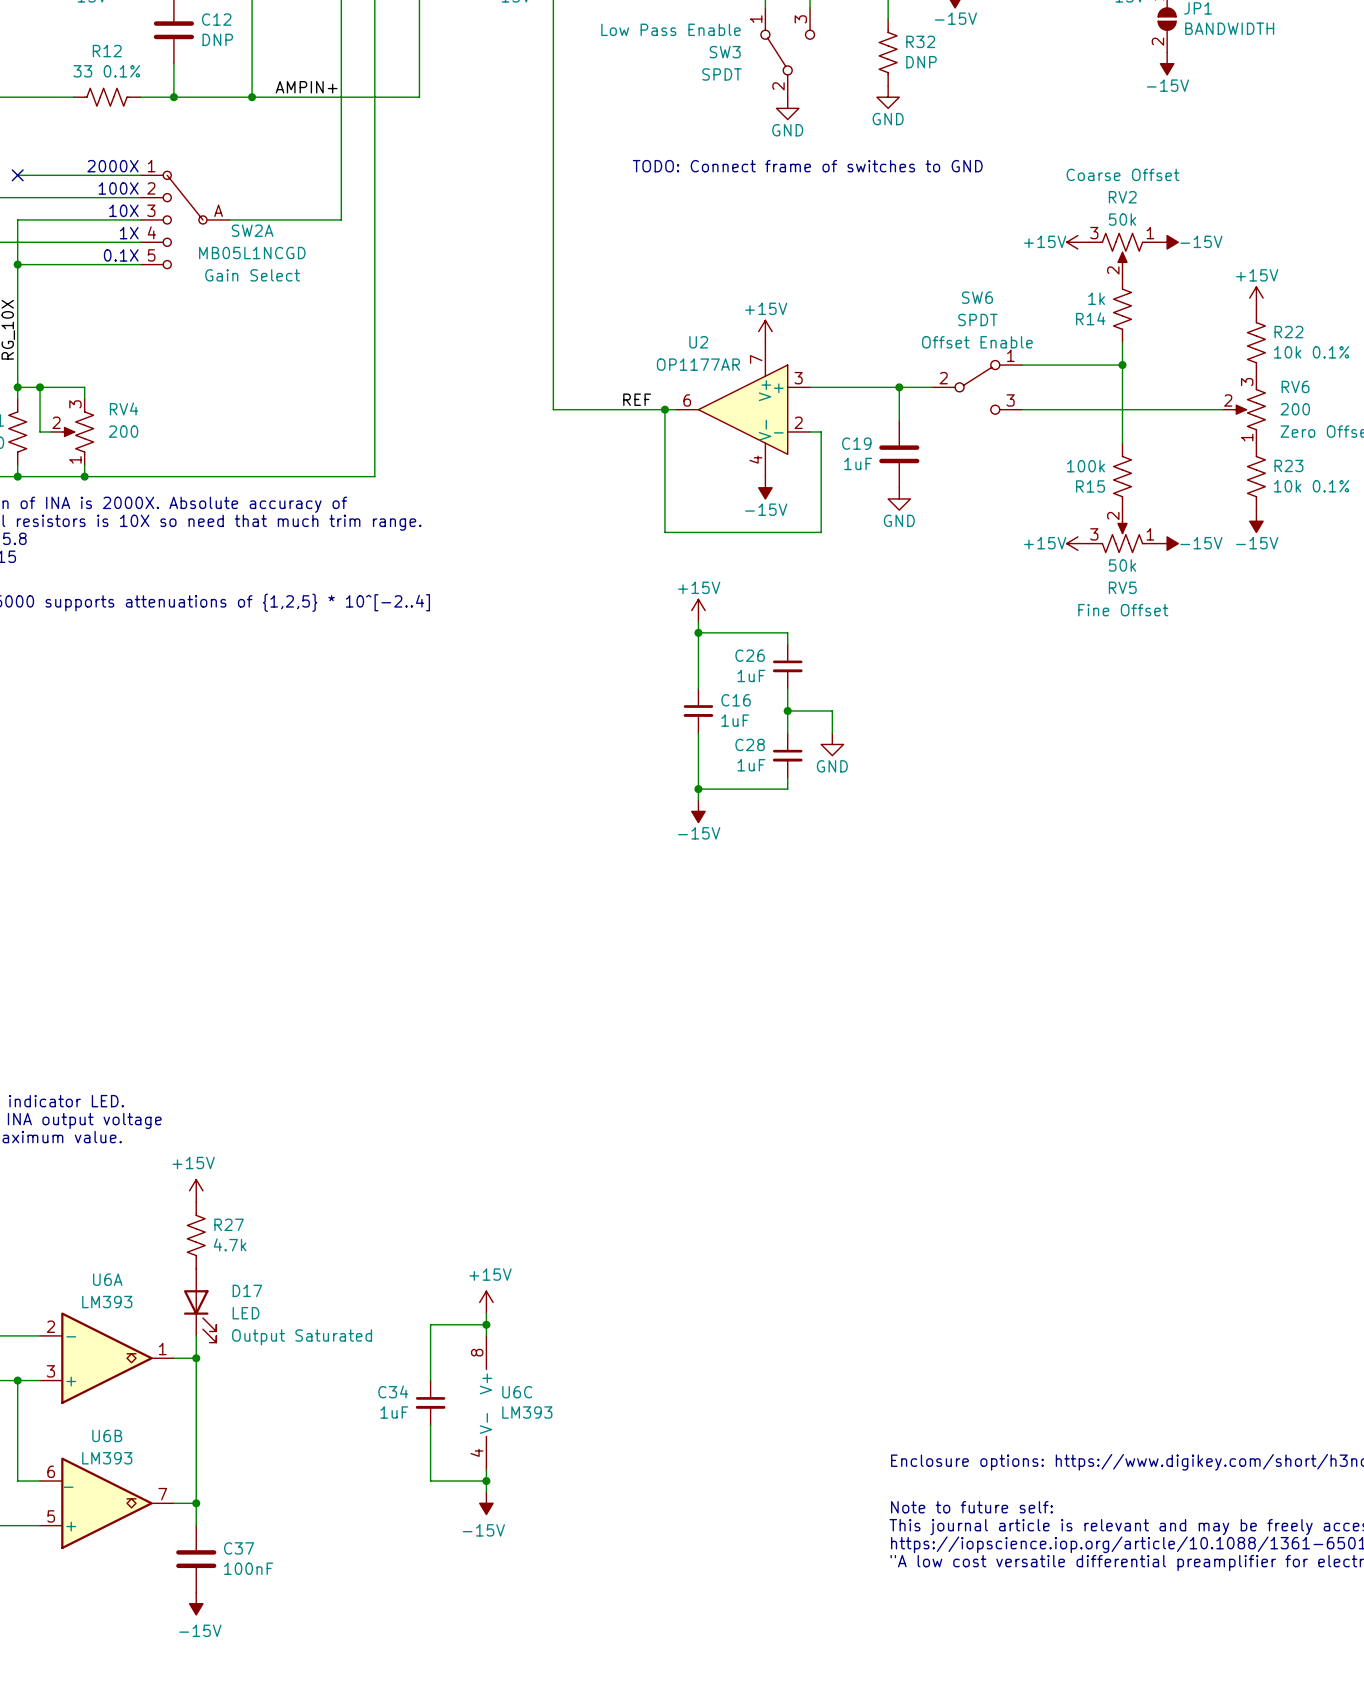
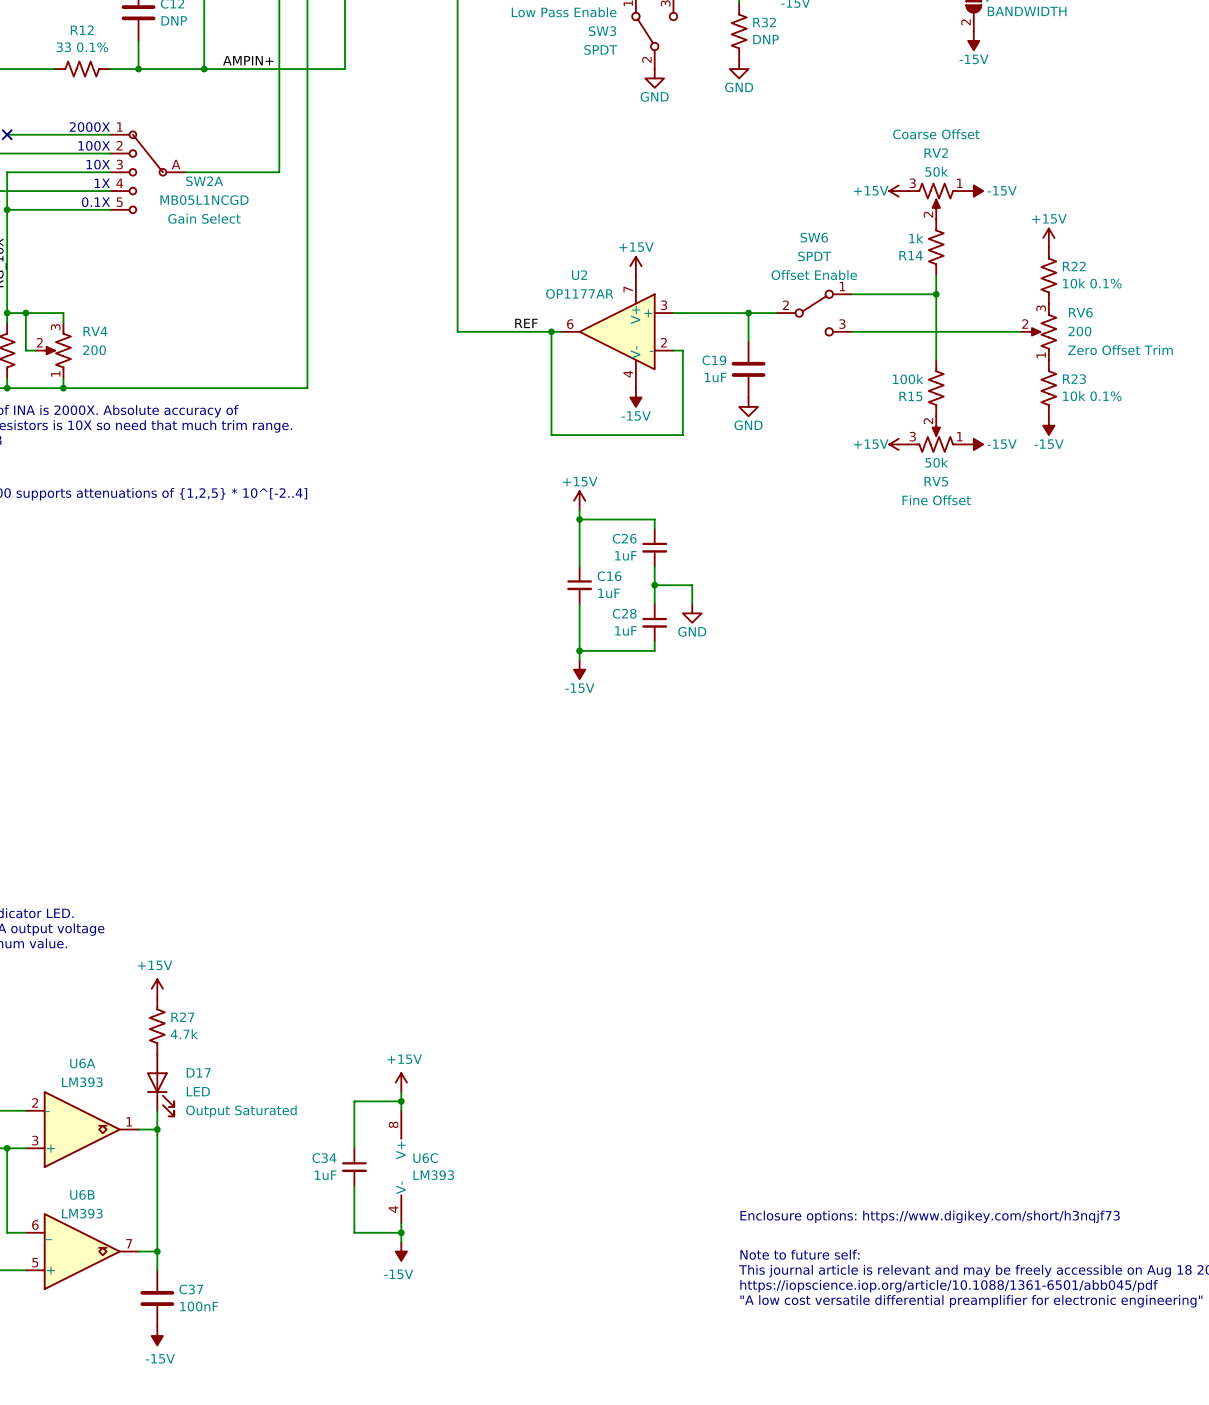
text: TODO: Connect frame of switches to GND (807, 166) -> none

